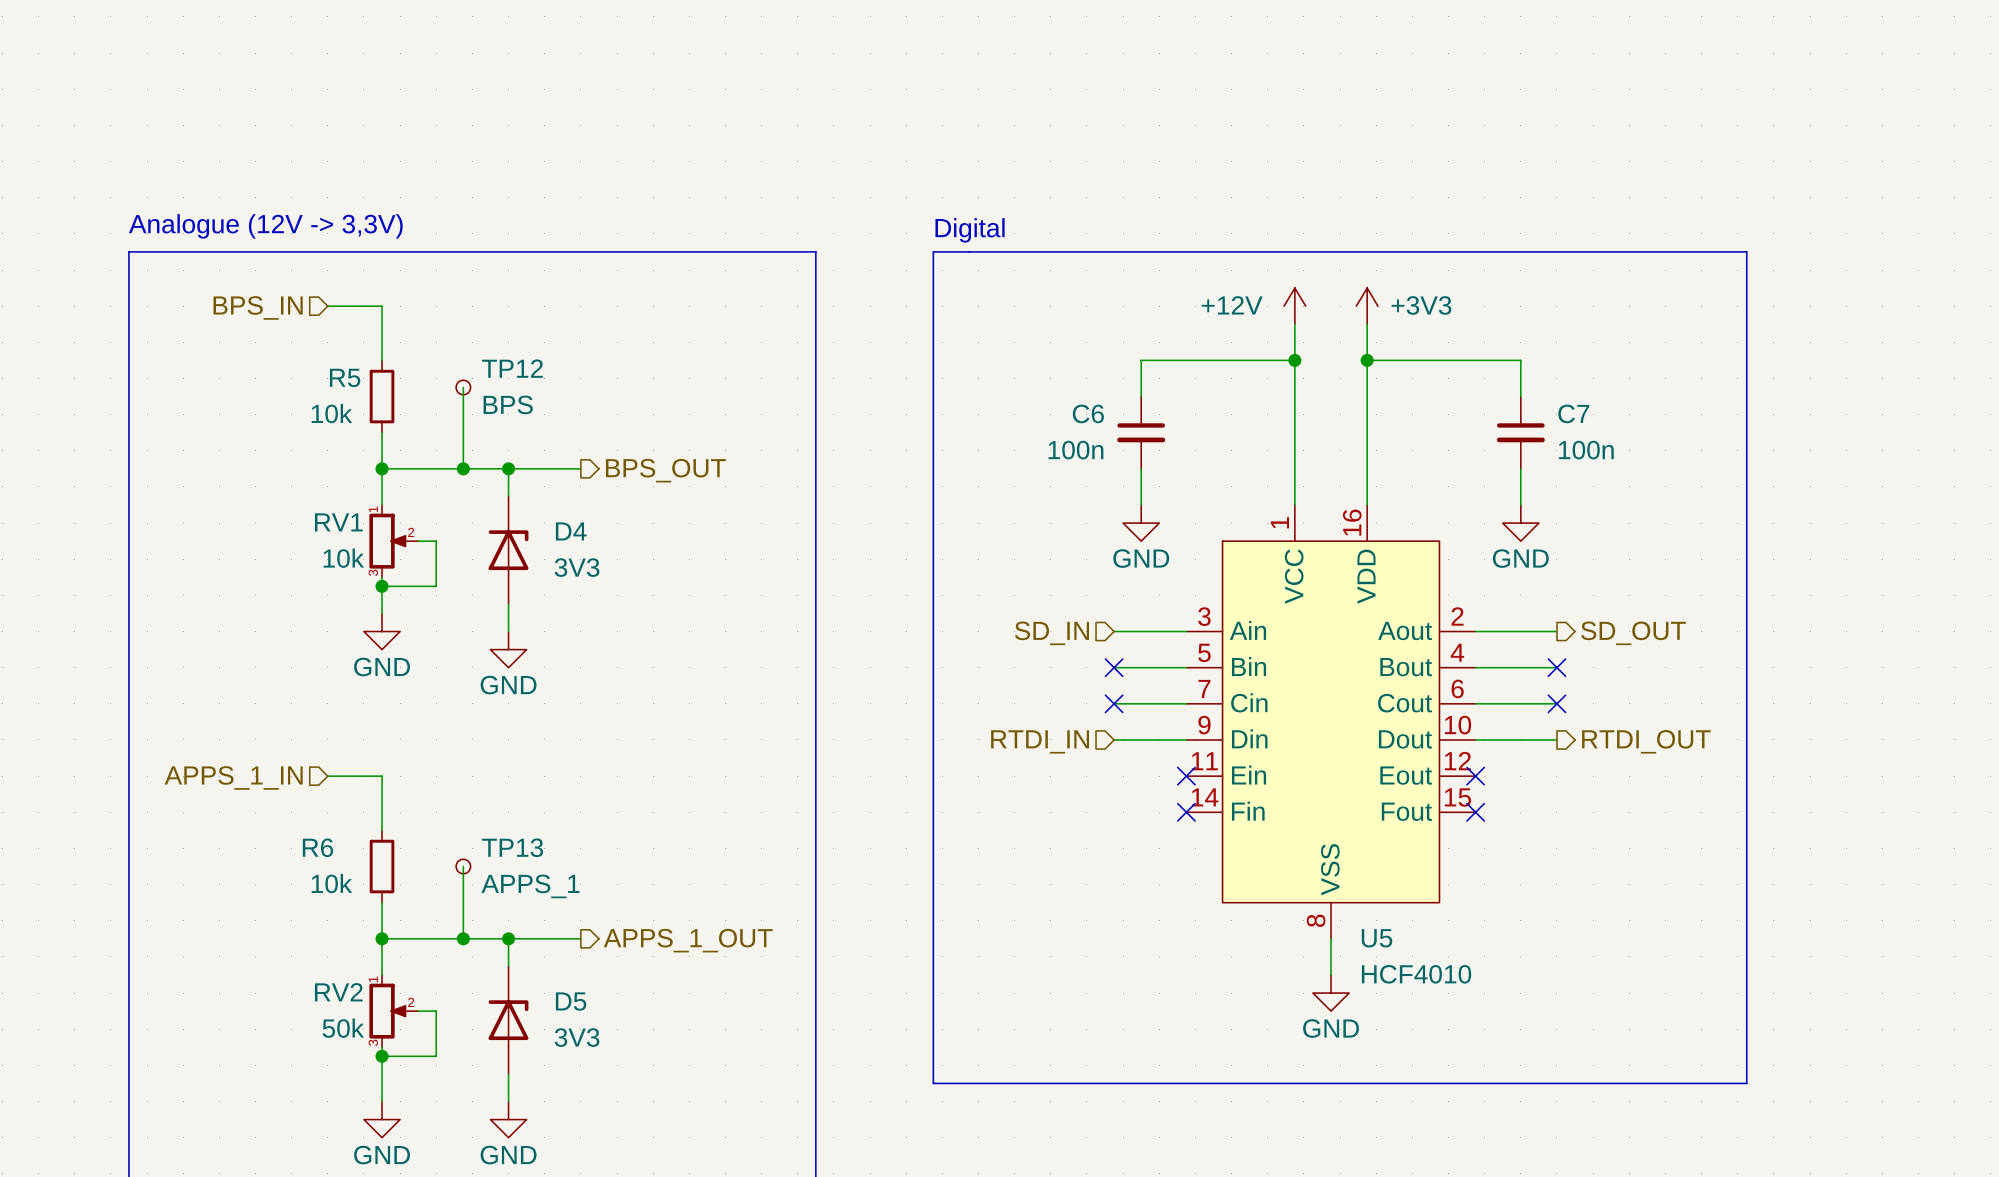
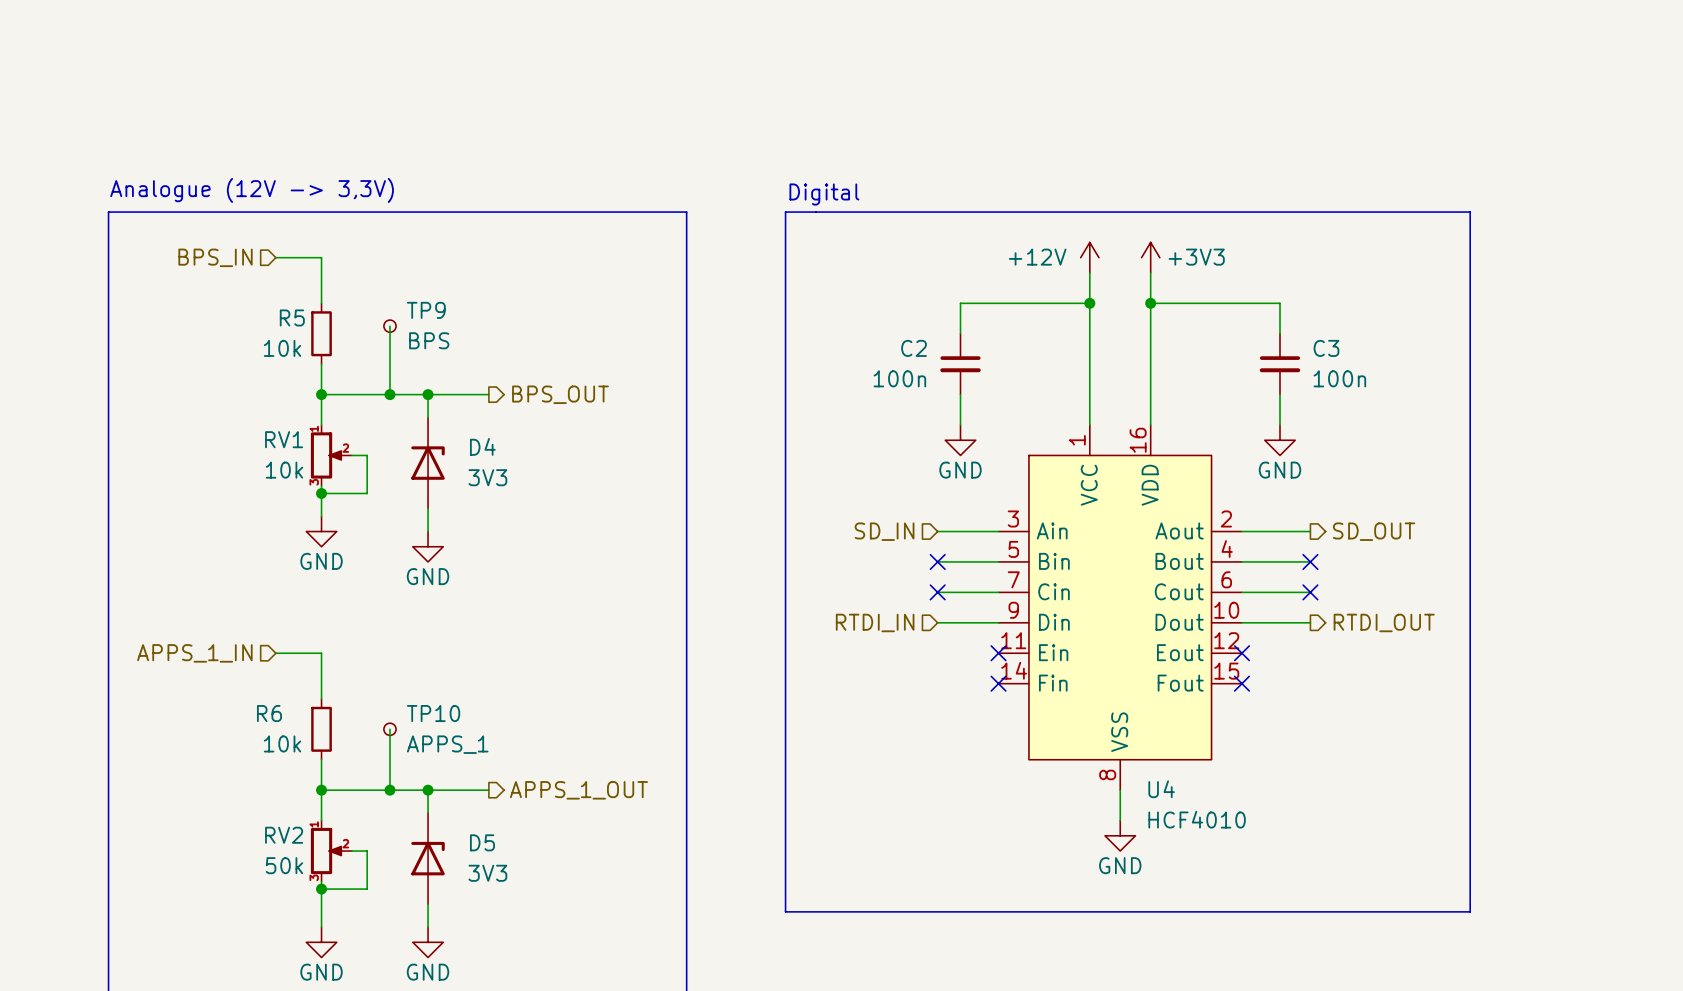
TP12 name: TP12 (512, 368) -> TP9 (426, 310)
C6 name: C6 (1088, 413) -> C2 (914, 348)
C7 name: C7 (1573, 413) -> C3 (1326, 348)
TP13 name: TP13 (512, 847) -> TP10 (433, 713)
U5 name: U5 (1377, 938) -> U4 (1161, 789)

